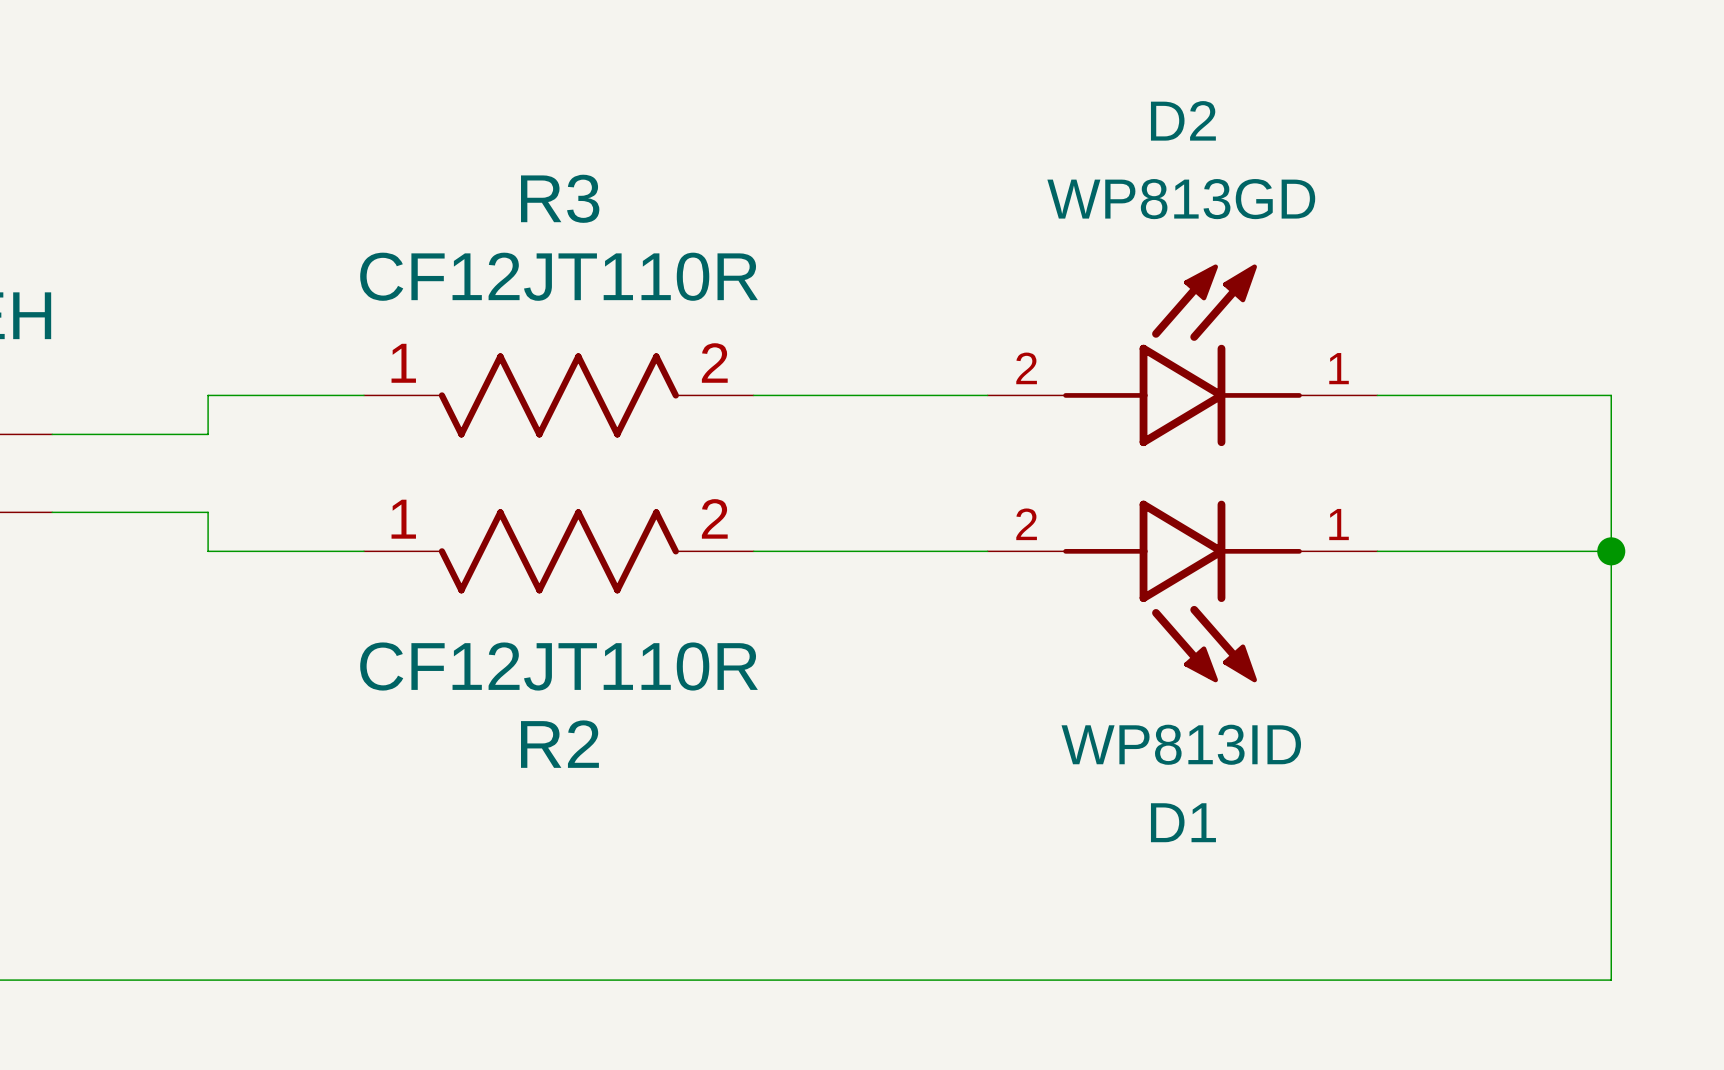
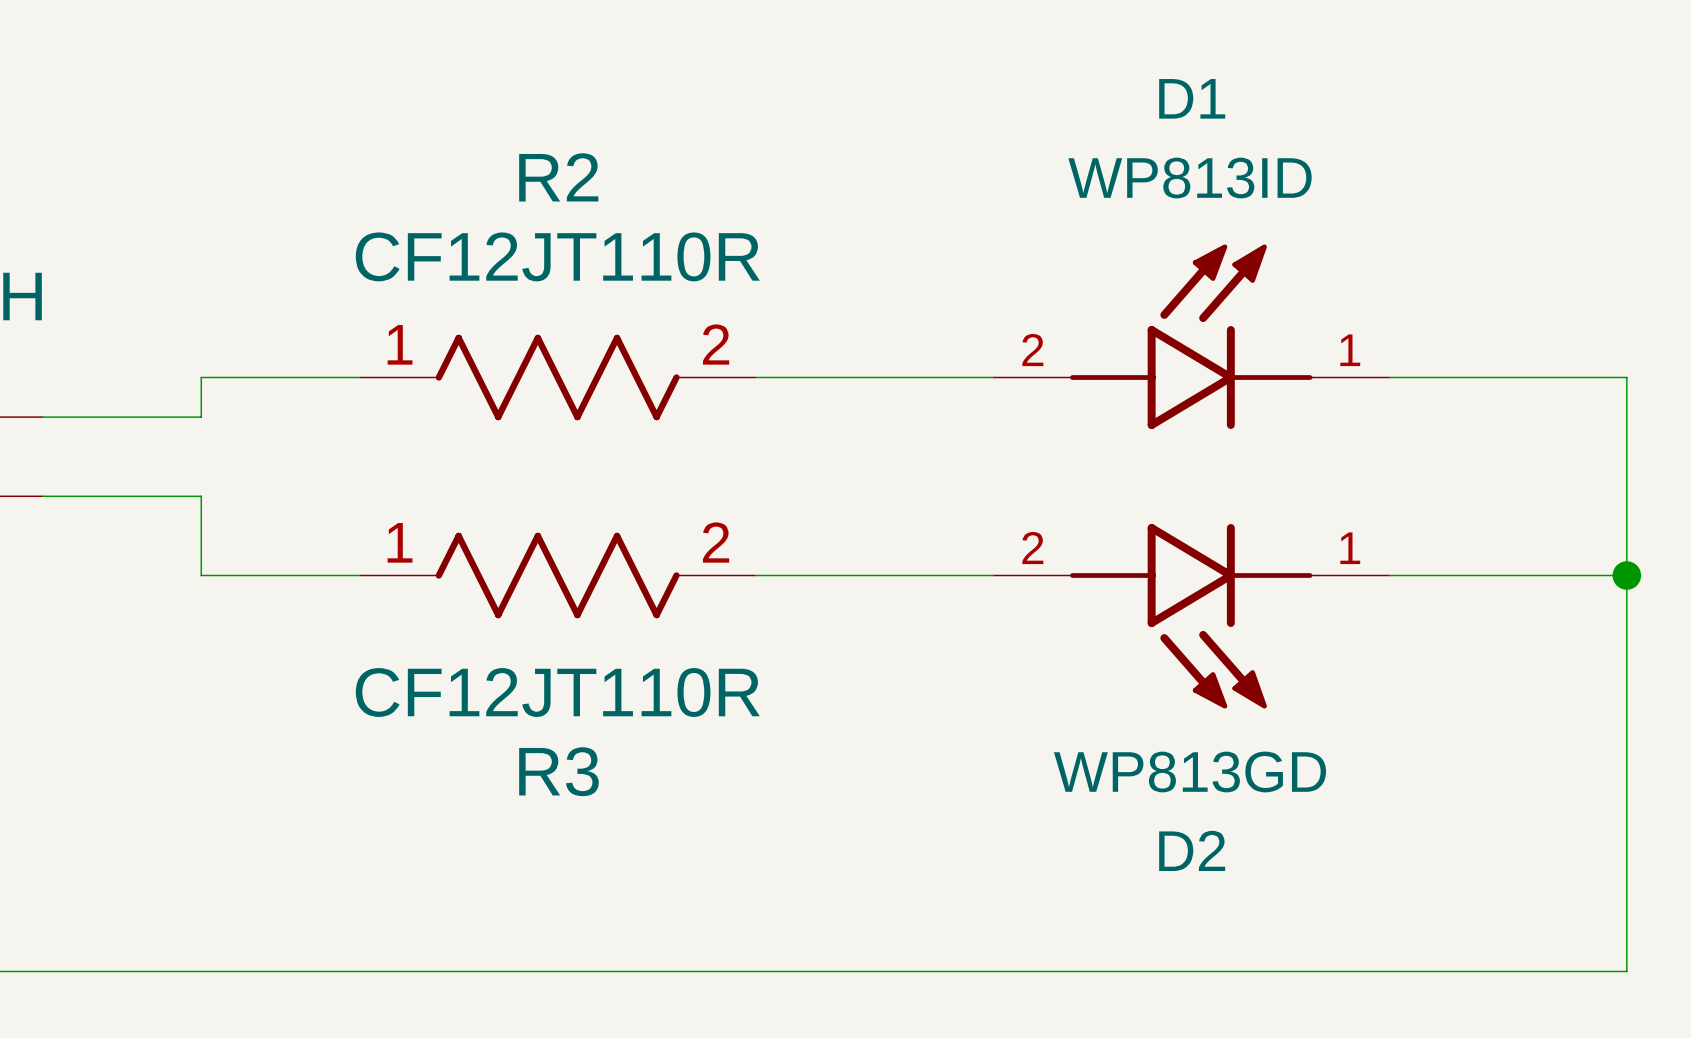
D2 name: D2 (1183, 120) -> D1 (1192, 98)
D2 value: WP813GD (1181, 199) -> WP813ID (1189, 178)
R3 flip: as is (558, 395) -> up-down (557, 575)
wire: (208, 551) (363, 551) -> (201, 535) (201, 575) (359, 575)
R2 flip: as is (558, 551) -> up-down (557, 377)
wire: (753, 551) (987, 551) -> (755, 575) (993, 575)
wire: (1377, 551) (1611, 551) -> (1389, 575) (1626, 575)
junction position: (1611, 551) -> (1626, 575)
D1: WP813ID (1182, 591) -> none
D2: none -> WP813GD (1191, 616)

